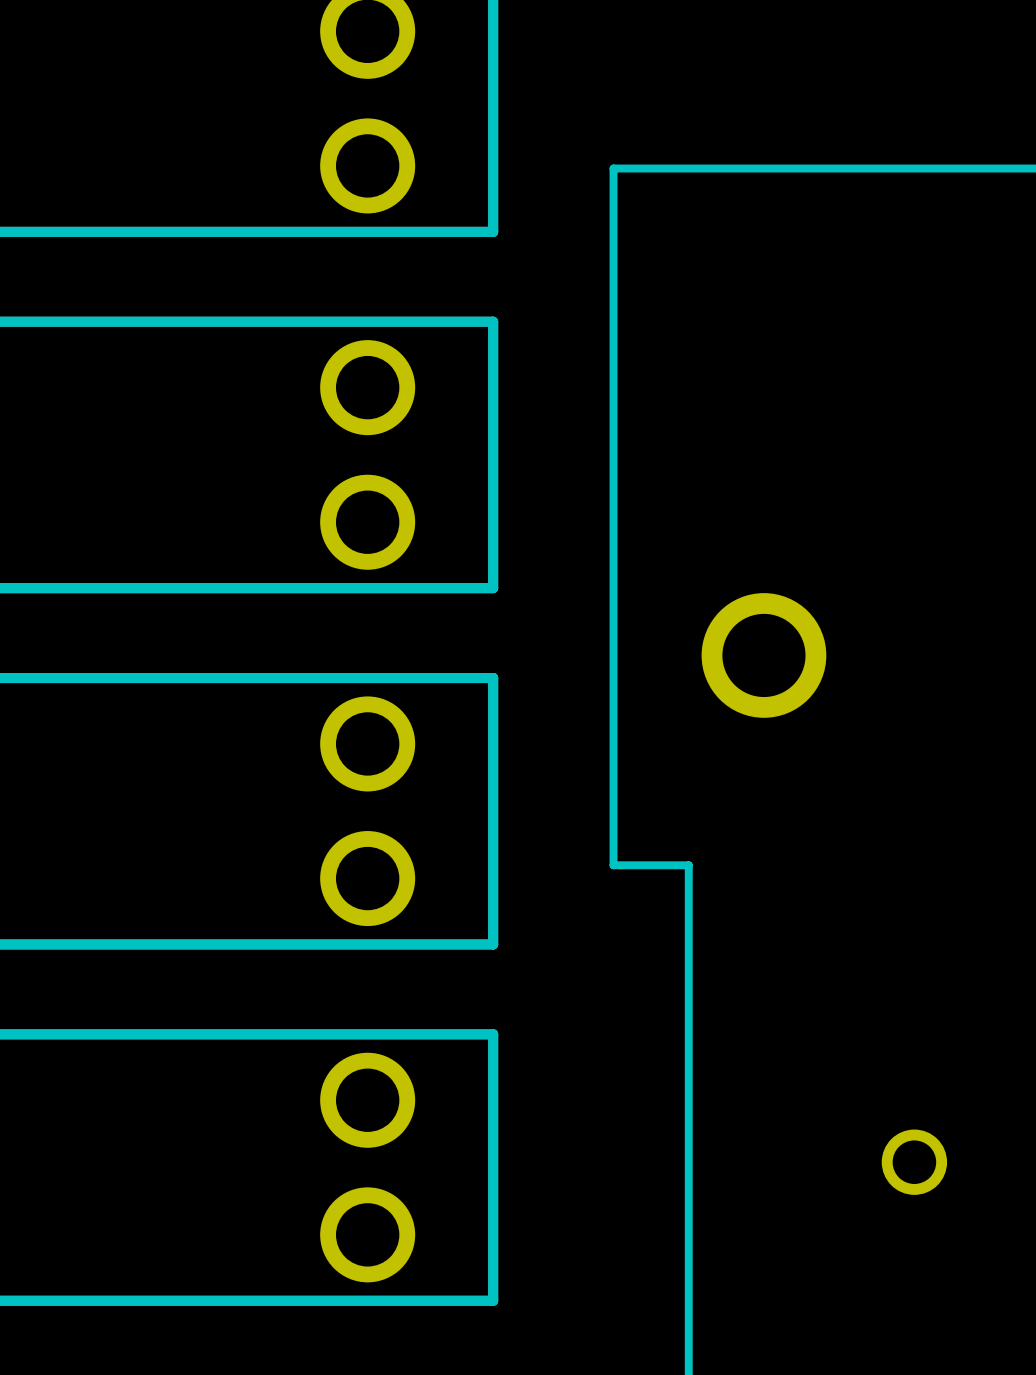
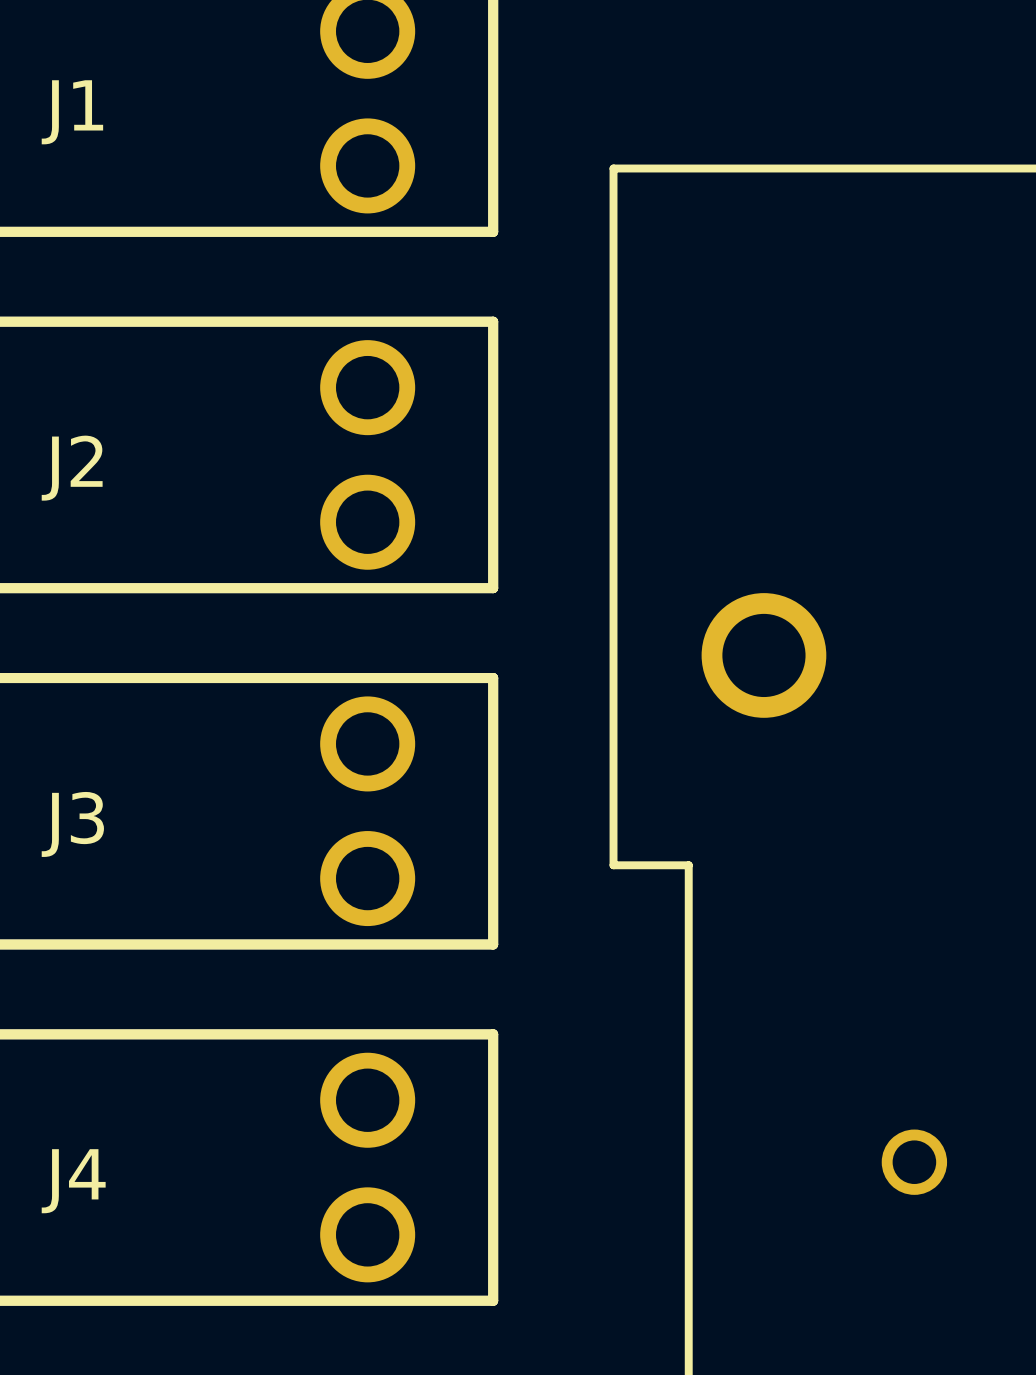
J1 name: none -> J1 (72, 112)
J2 name: none -> J2 (72, 468)
J3 name: none -> J3 (72, 824)
J4 name: none -> J4 (73, 1181)

